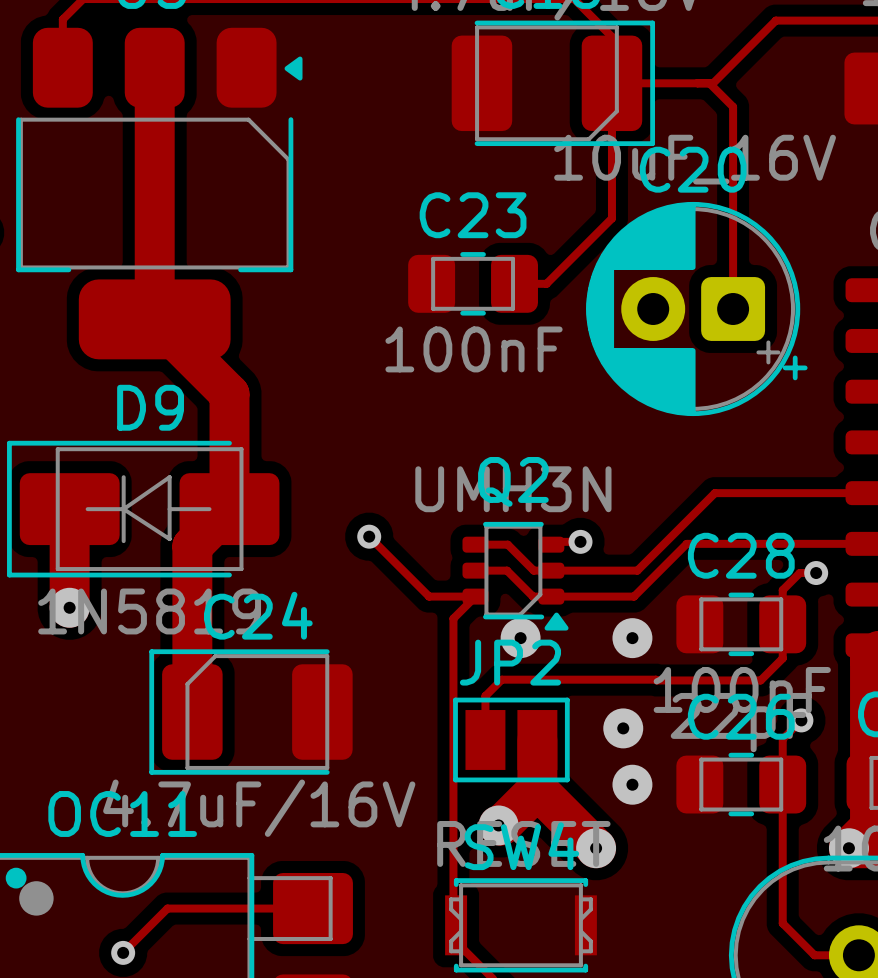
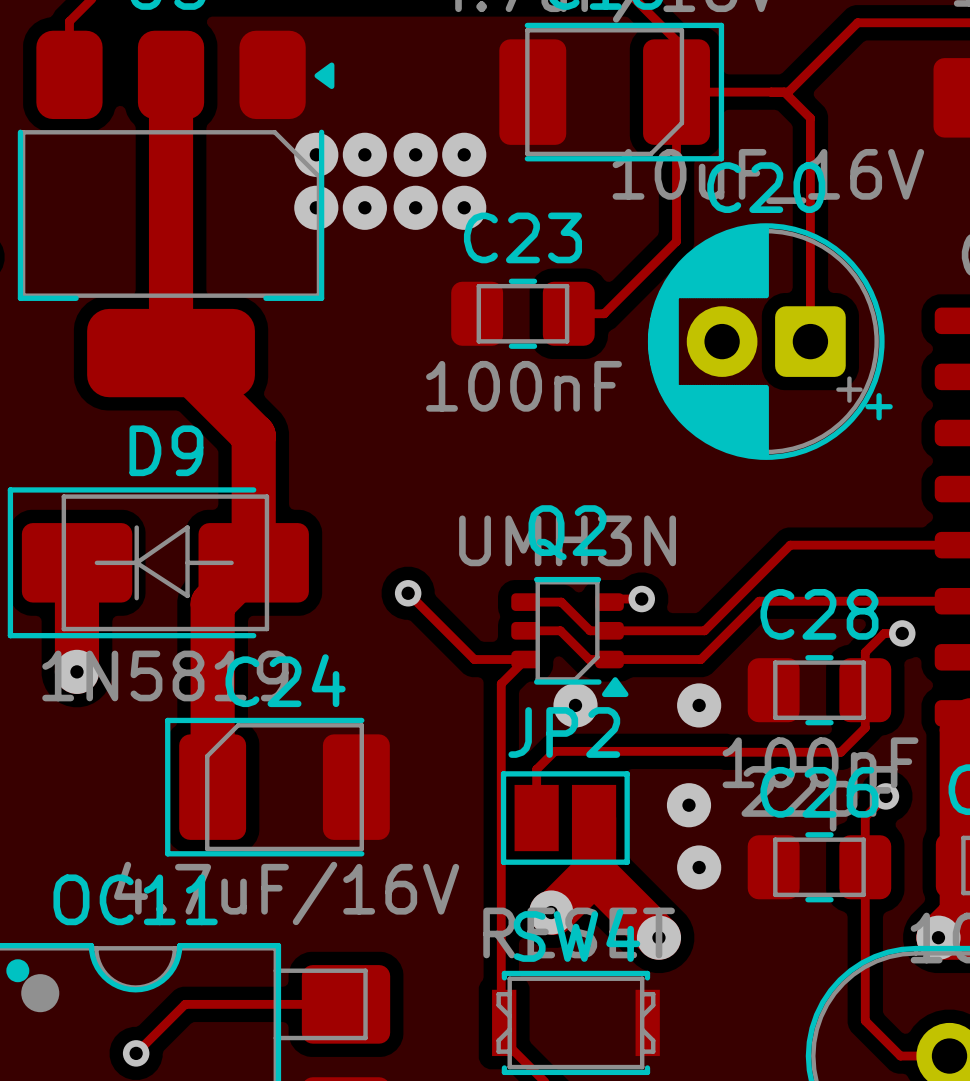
via: none -> (316, 154)
via: none -> (364, 154)
via: none -> (415, 154)
via: none -> (464, 154)
via: none -> (316, 207)
via: none -> (364, 207)
via: none -> (415, 207)
via: none -> (464, 207)

